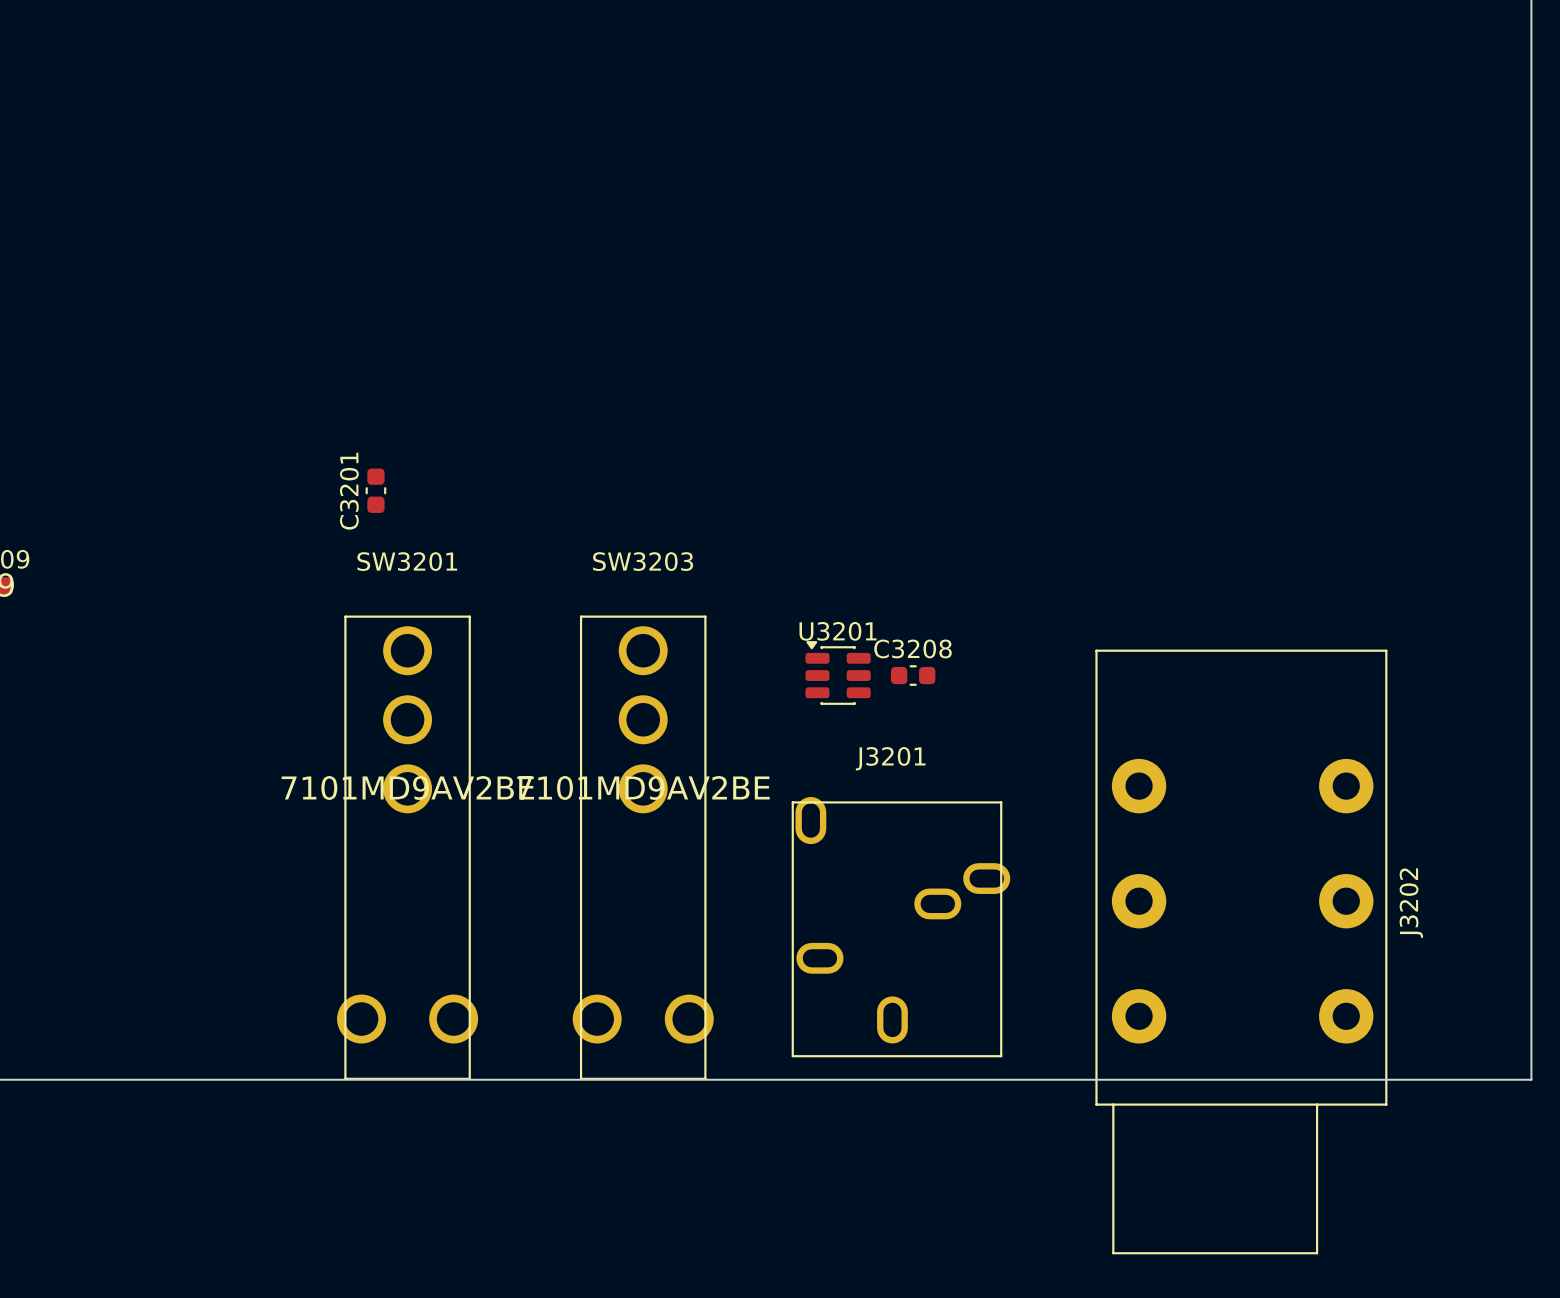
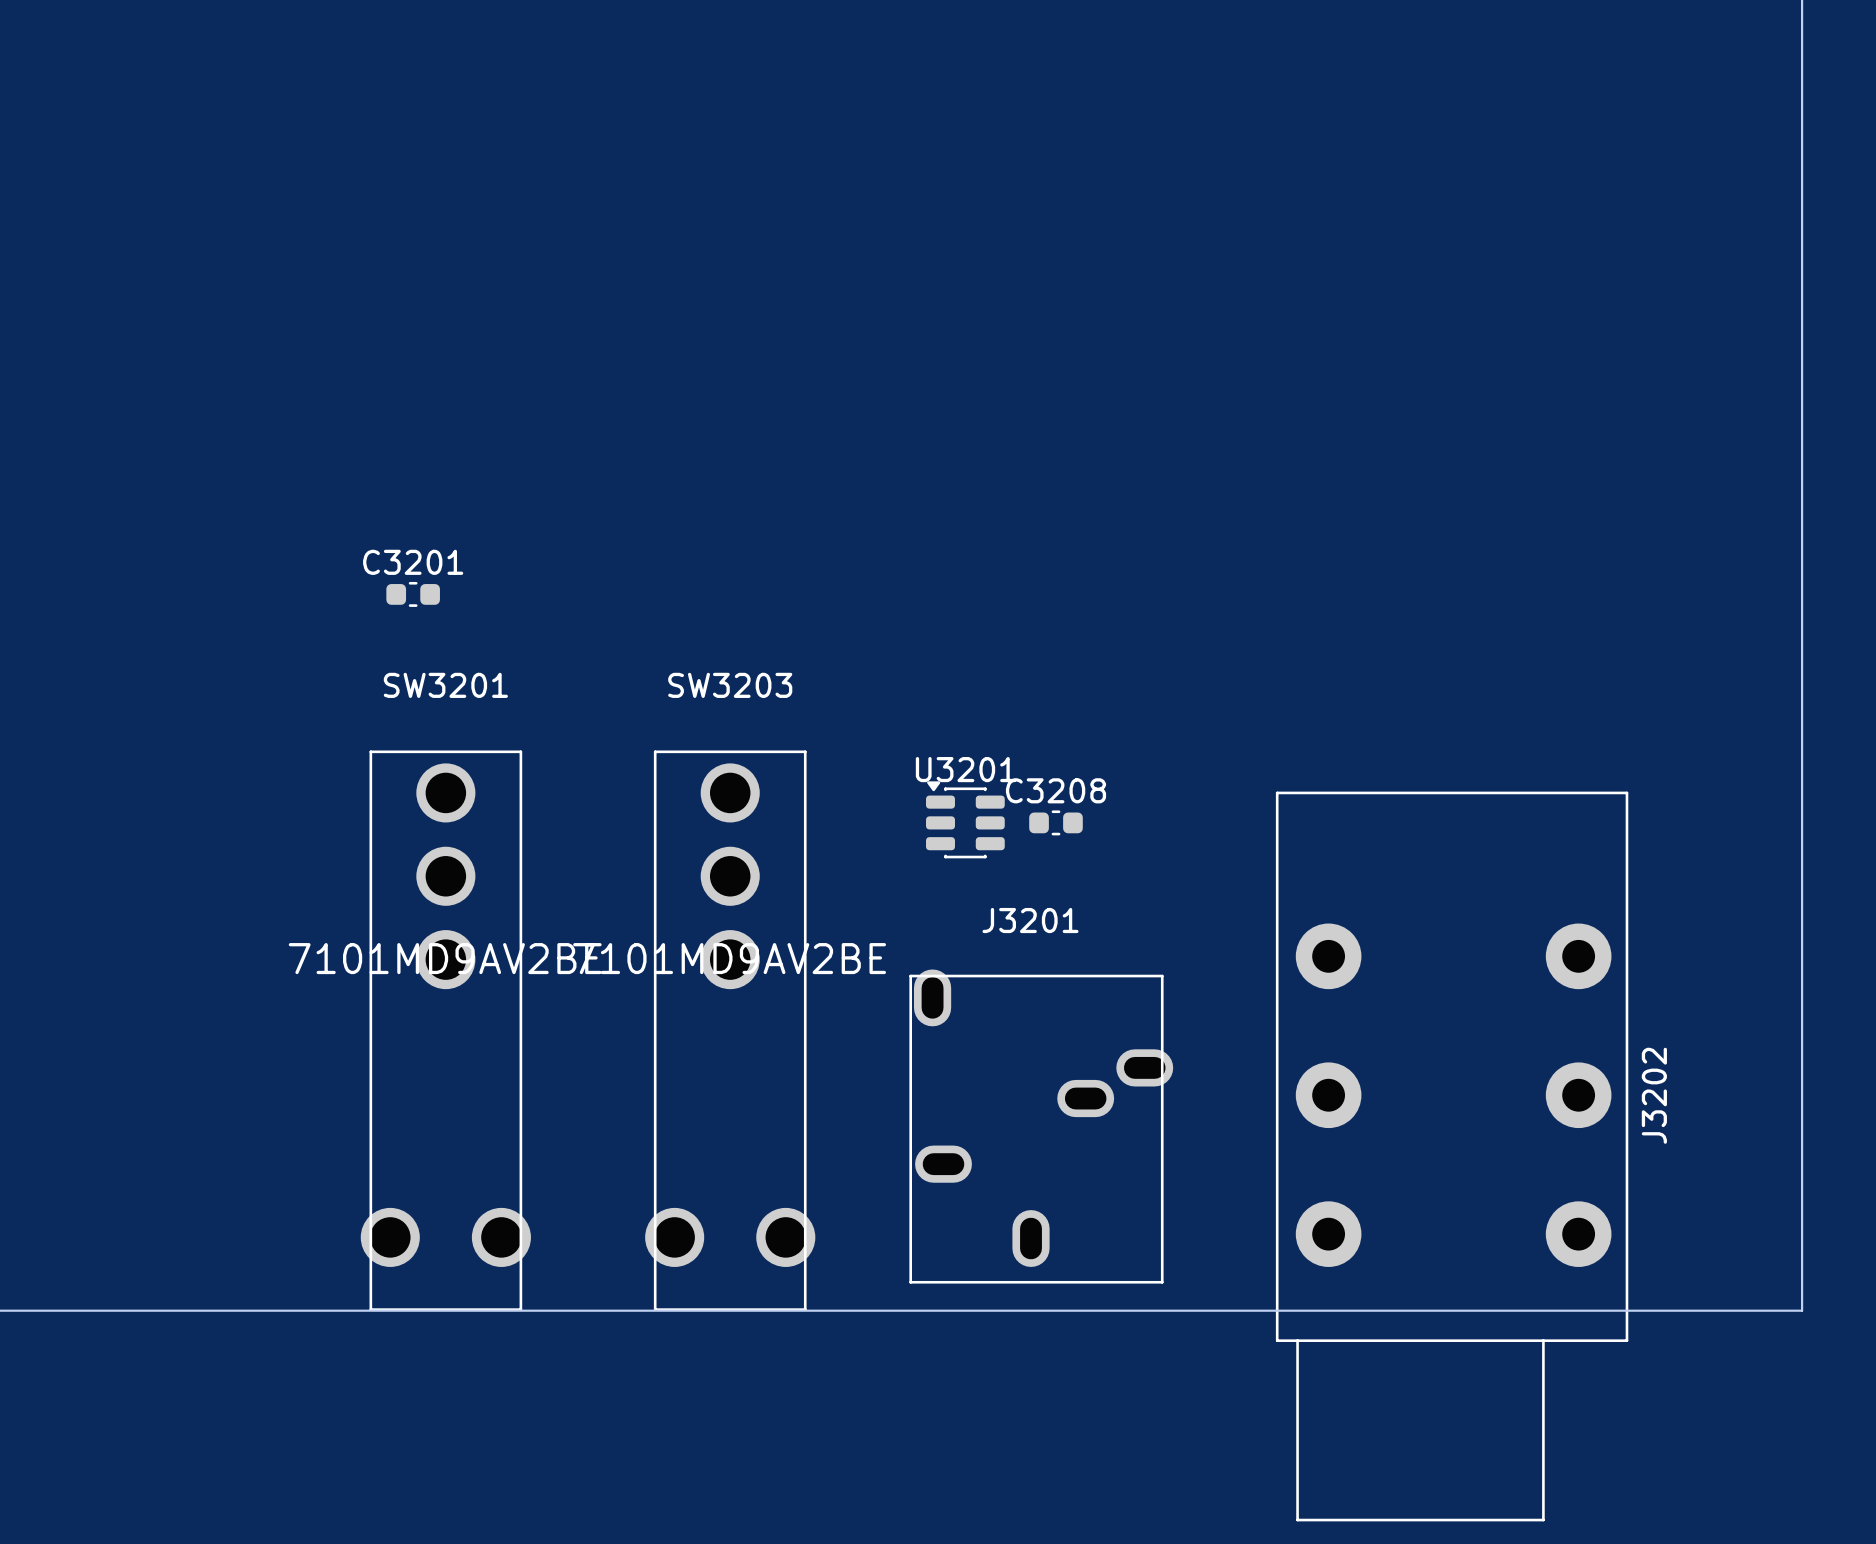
C3201 rotation: 0° (375, 490) -> 90° clockwise (413, 594)

